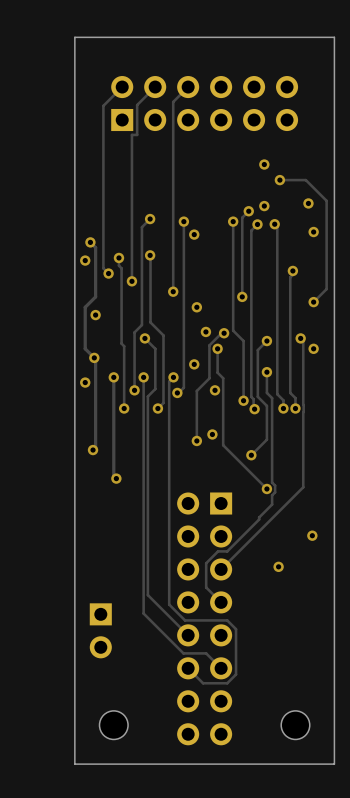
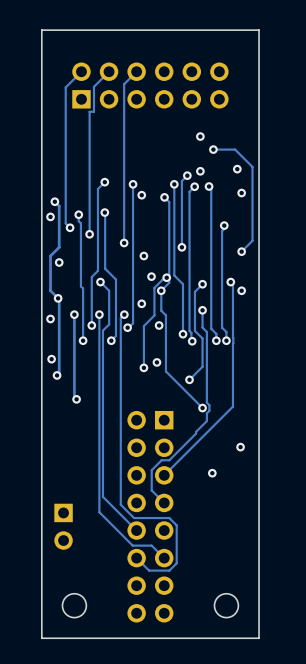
track: none -> (164, 197) (169, 202) (169, 282) (161, 290)
via: none -> (164, 197)
via: none -> (51, 359)

